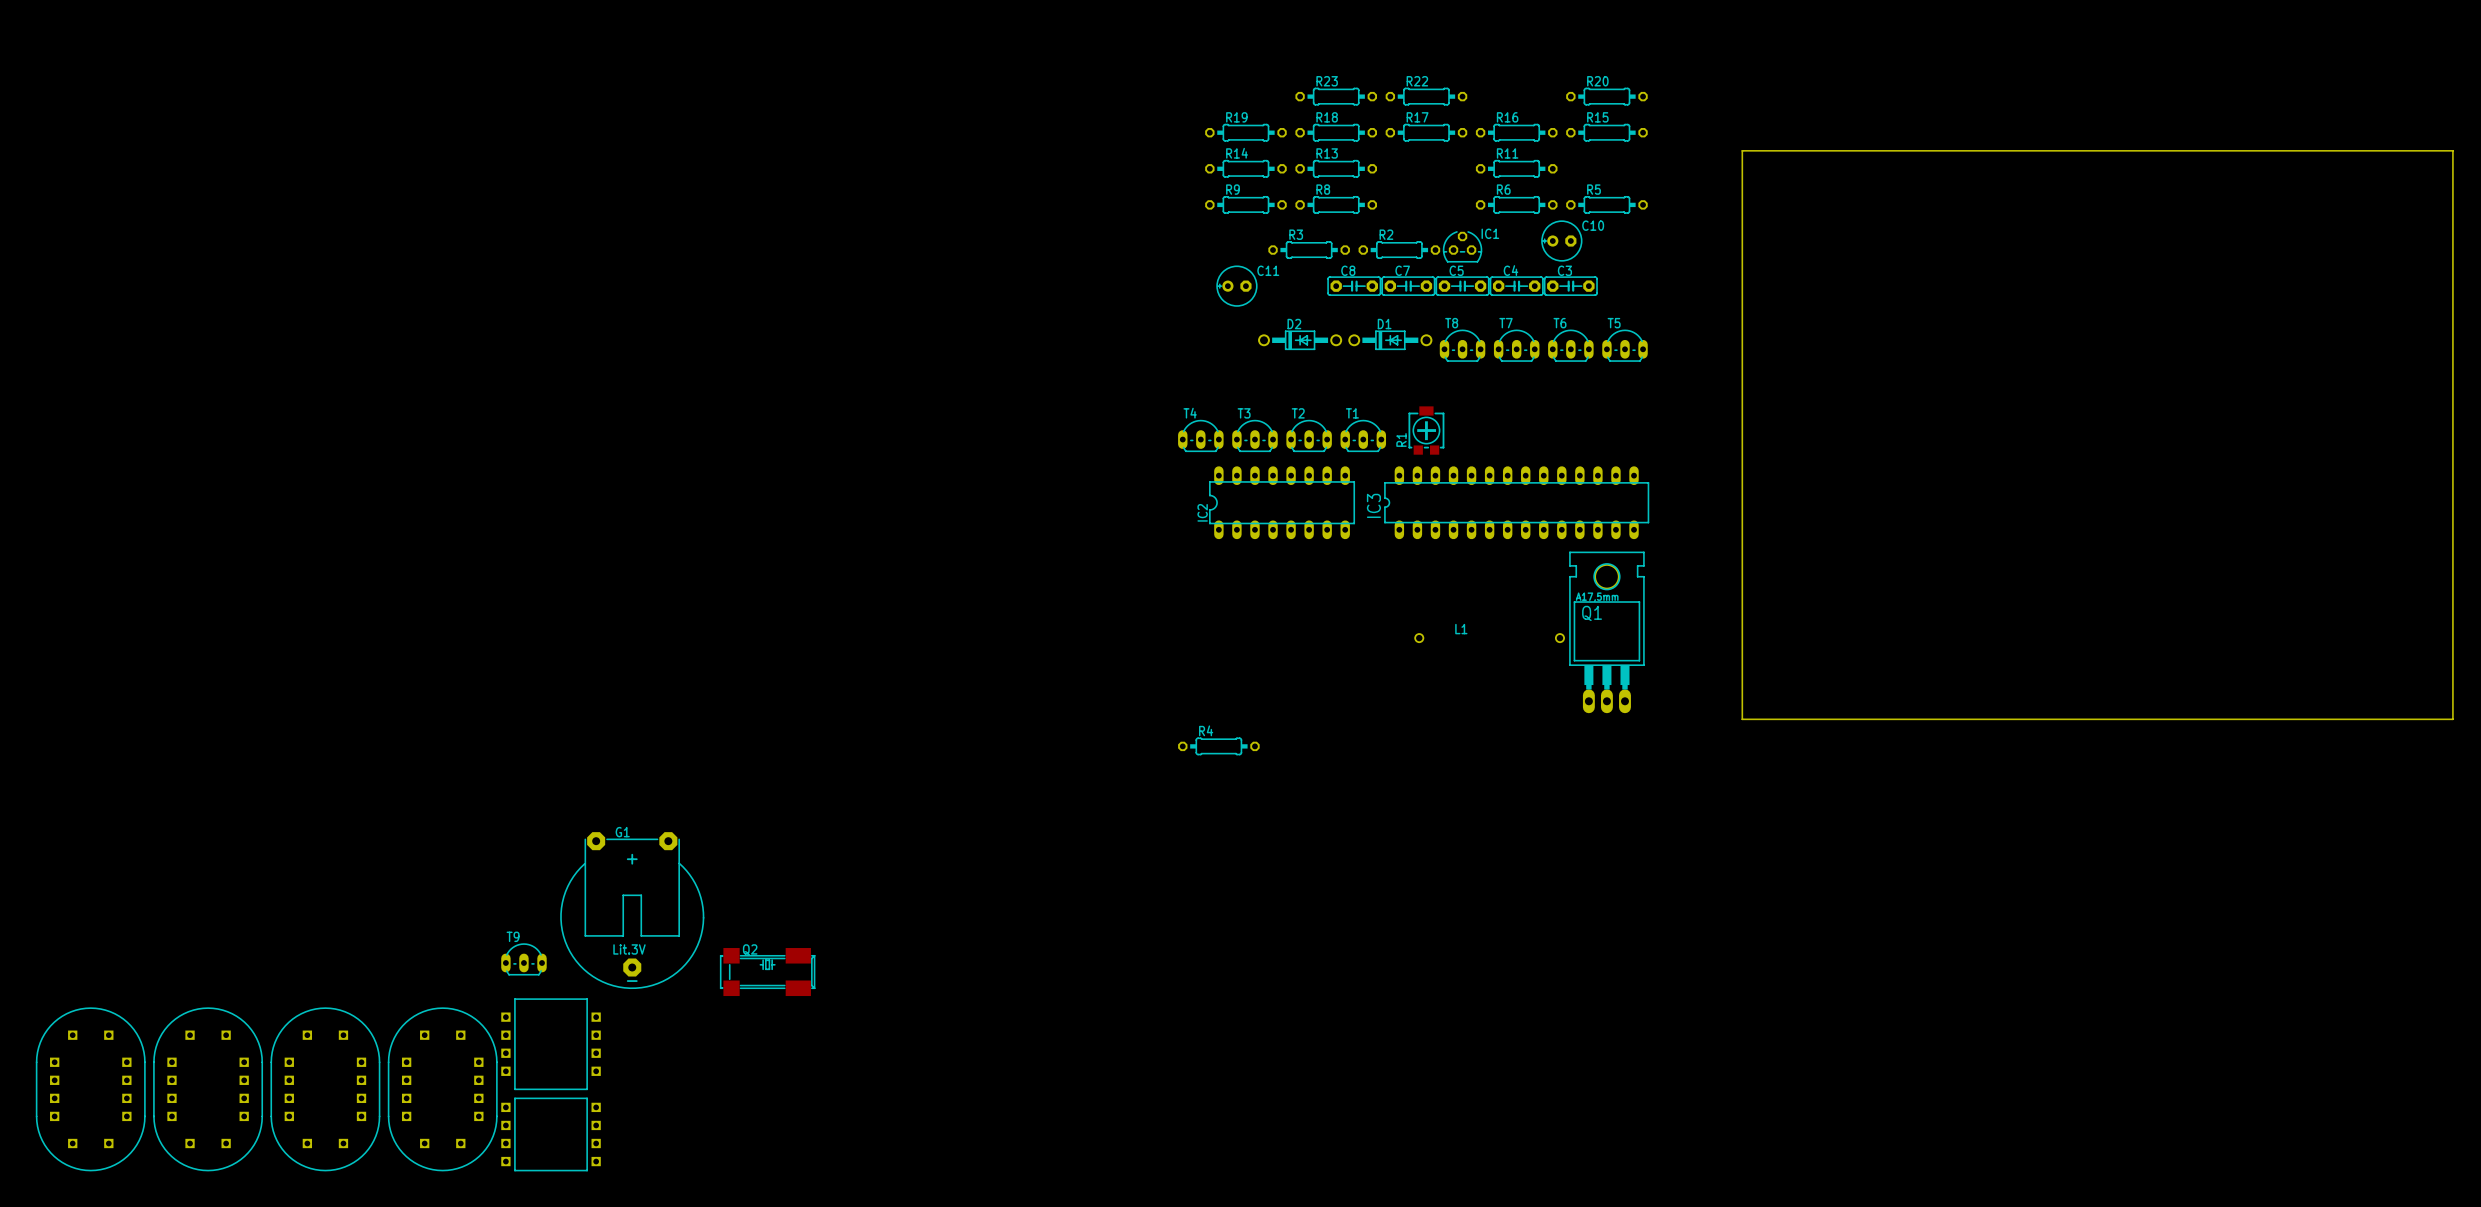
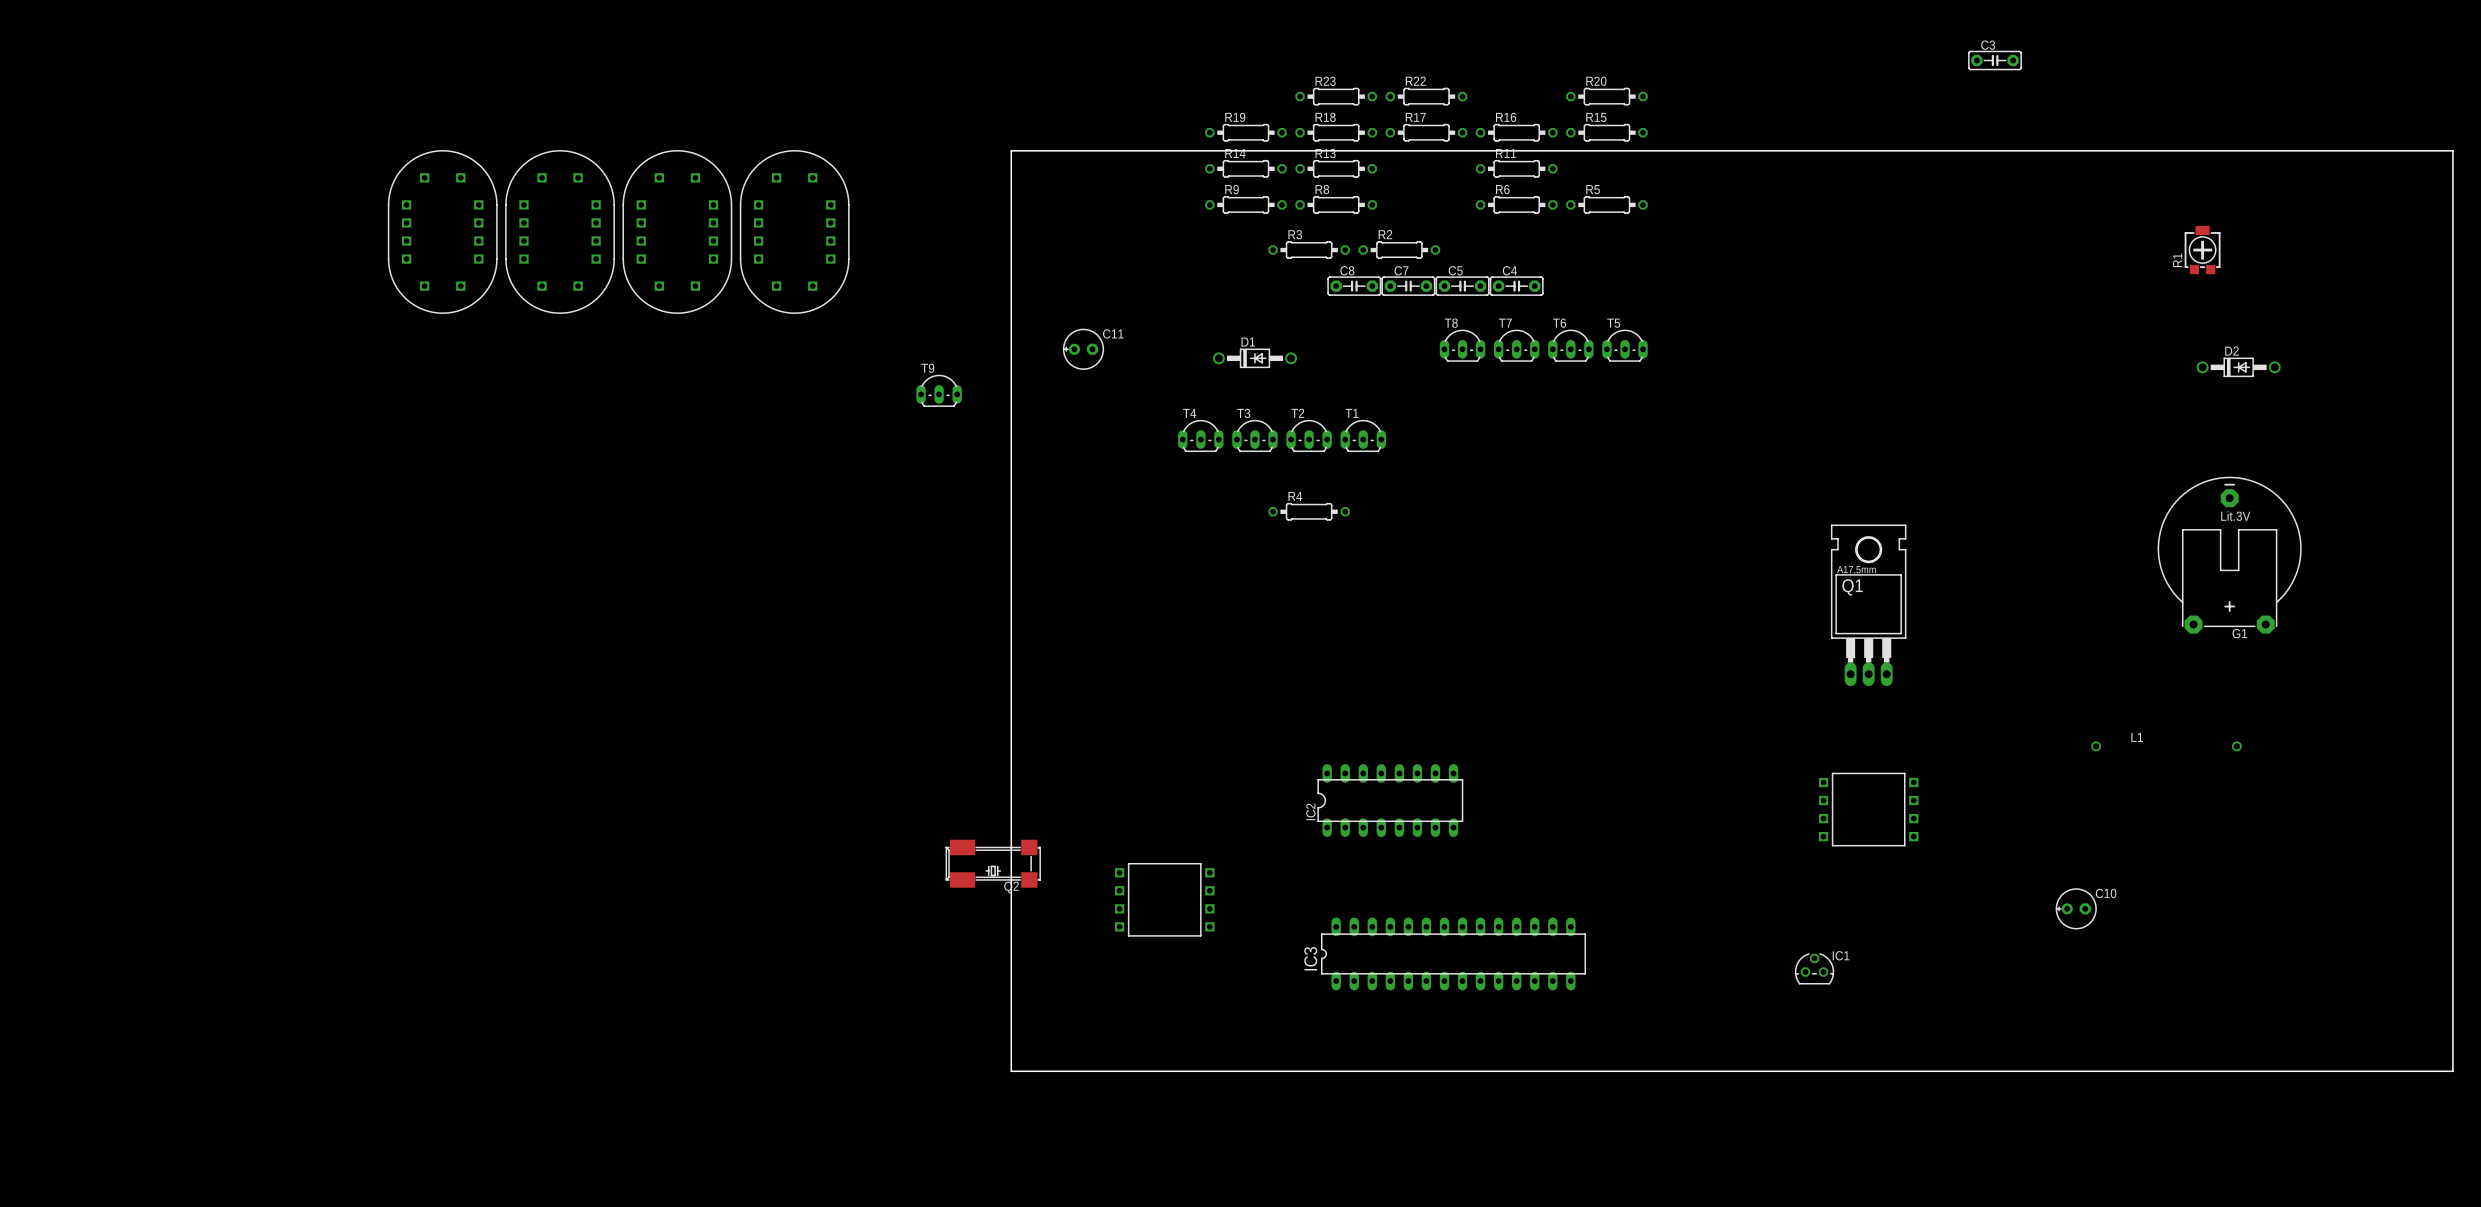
board edge: (1742, 150) (1742, 719) (2452, 719) -> (1742, 150) (1011, 150) (1011, 1071) (2452, 1071) (2452, 719)
part: none -> (442, 231)
part: none -> (560, 231)
part: none -> (677, 231)
part: none -> (794, 231)
C10 position: (1561, 241) -> (2076, 908)
IC1 position: (1462, 246) -> (1814, 968)
C11 position: (1236, 286) -> (1083, 349)
C3 position: (1570, 286) -> (1995, 60)
D2 position: (1300, 340) -> (2238, 367)
D1 position: (1390, 340) -> (1254, 358)
R1 position: (1426, 430) -> (2202, 250)
IC2 position: (1282, 502) -> (1390, 800)
IC3 position: (1516, 502) -> (1453, 953)
Q1 position: (1606, 632) -> (1868, 605)
L1 position: (1489, 638) -> (2166, 746)
R4 position: (1218, 746) -> (1309, 511)
part: none -> (1868, 809)
G1 footprint: [560, 832, 705, 989] -> [2157, 476, 2302, 634]
G1 name position: G1 (622, 832) -> G1 (2239, 633)
part: none -> (1164, 899)
T9 position: (523, 959) -> (939, 390)
Q2 rotation: 0° (767, 972) -> 180° (993, 863)
Q2 position: (767, 972) -> (993, 863)
part: (551, 1044) -> none
part: (90, 1089) -> none
part: (208, 1089) -> none
part: (325, 1089) -> none
part: (442, 1089) -> none
part: (551, 1134) -> none

